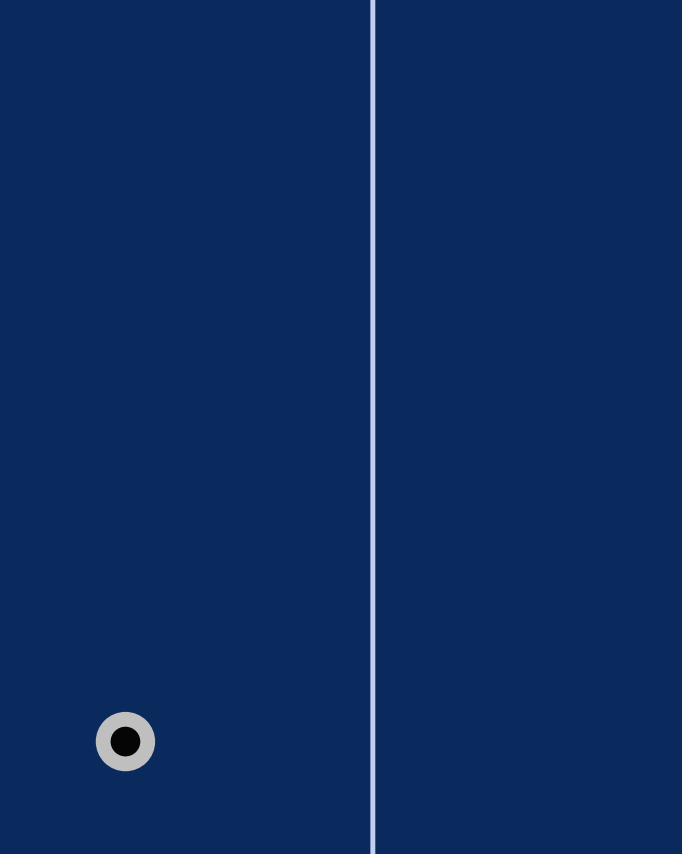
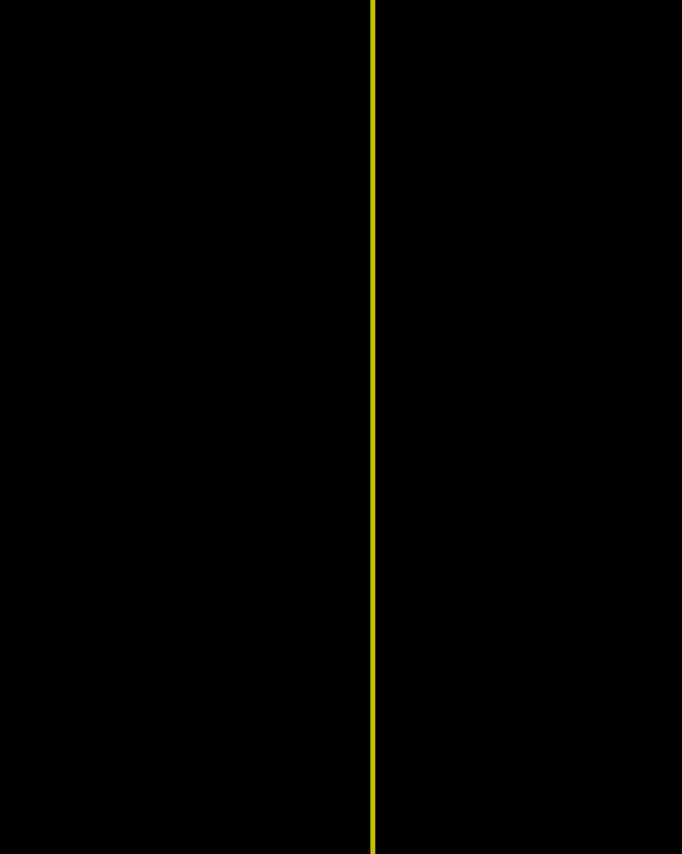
via: (125, 741) -> none

